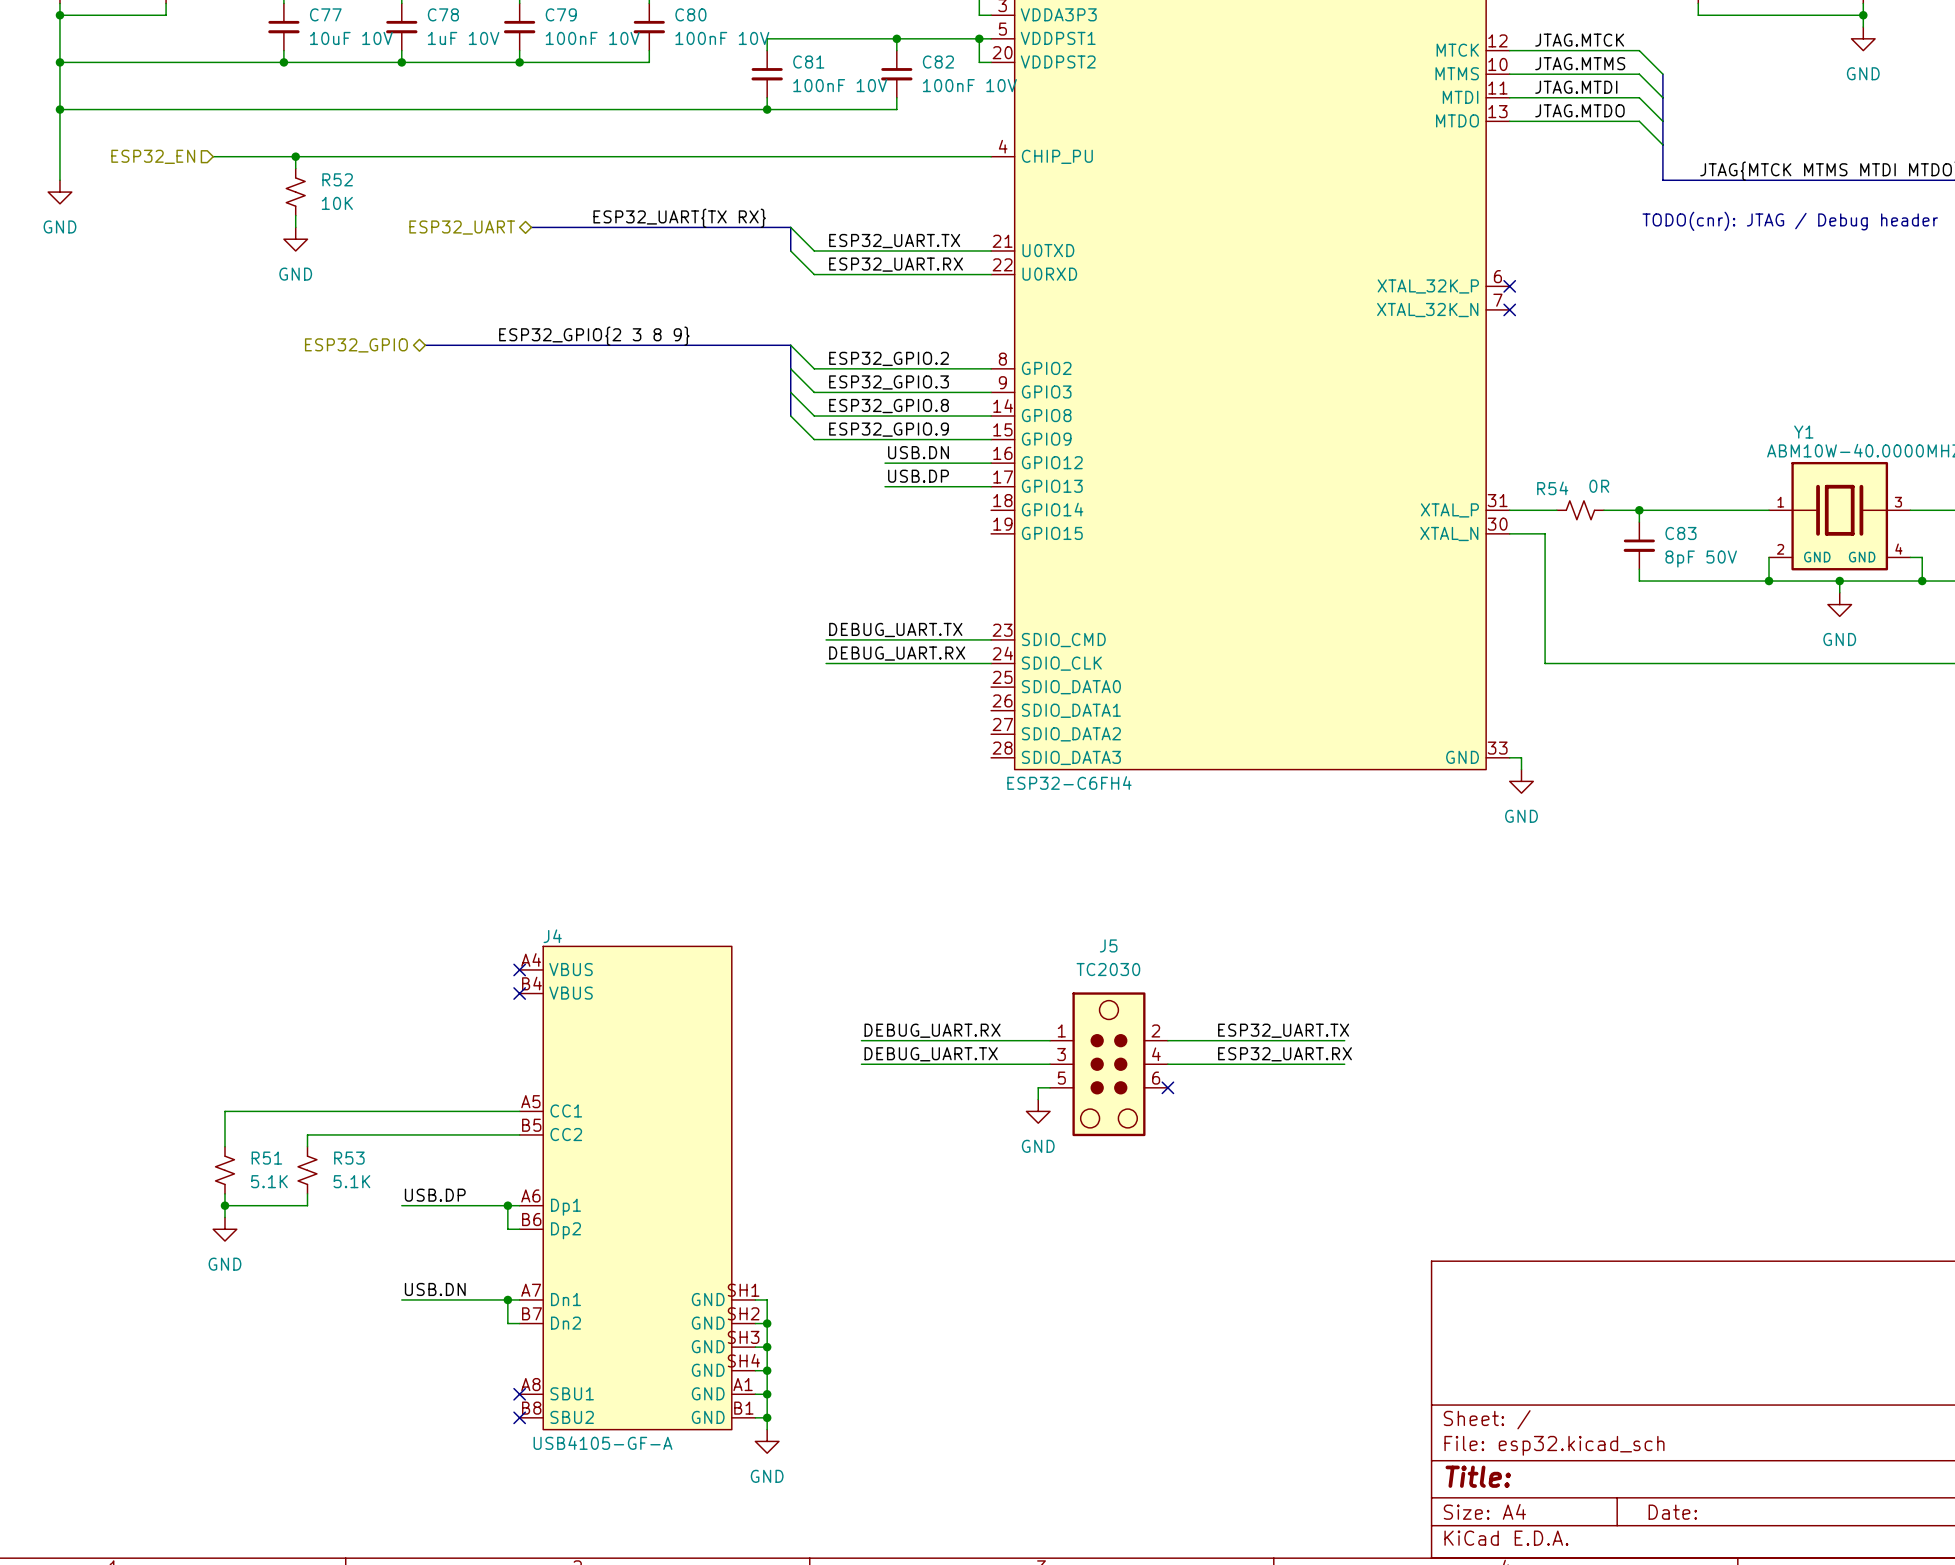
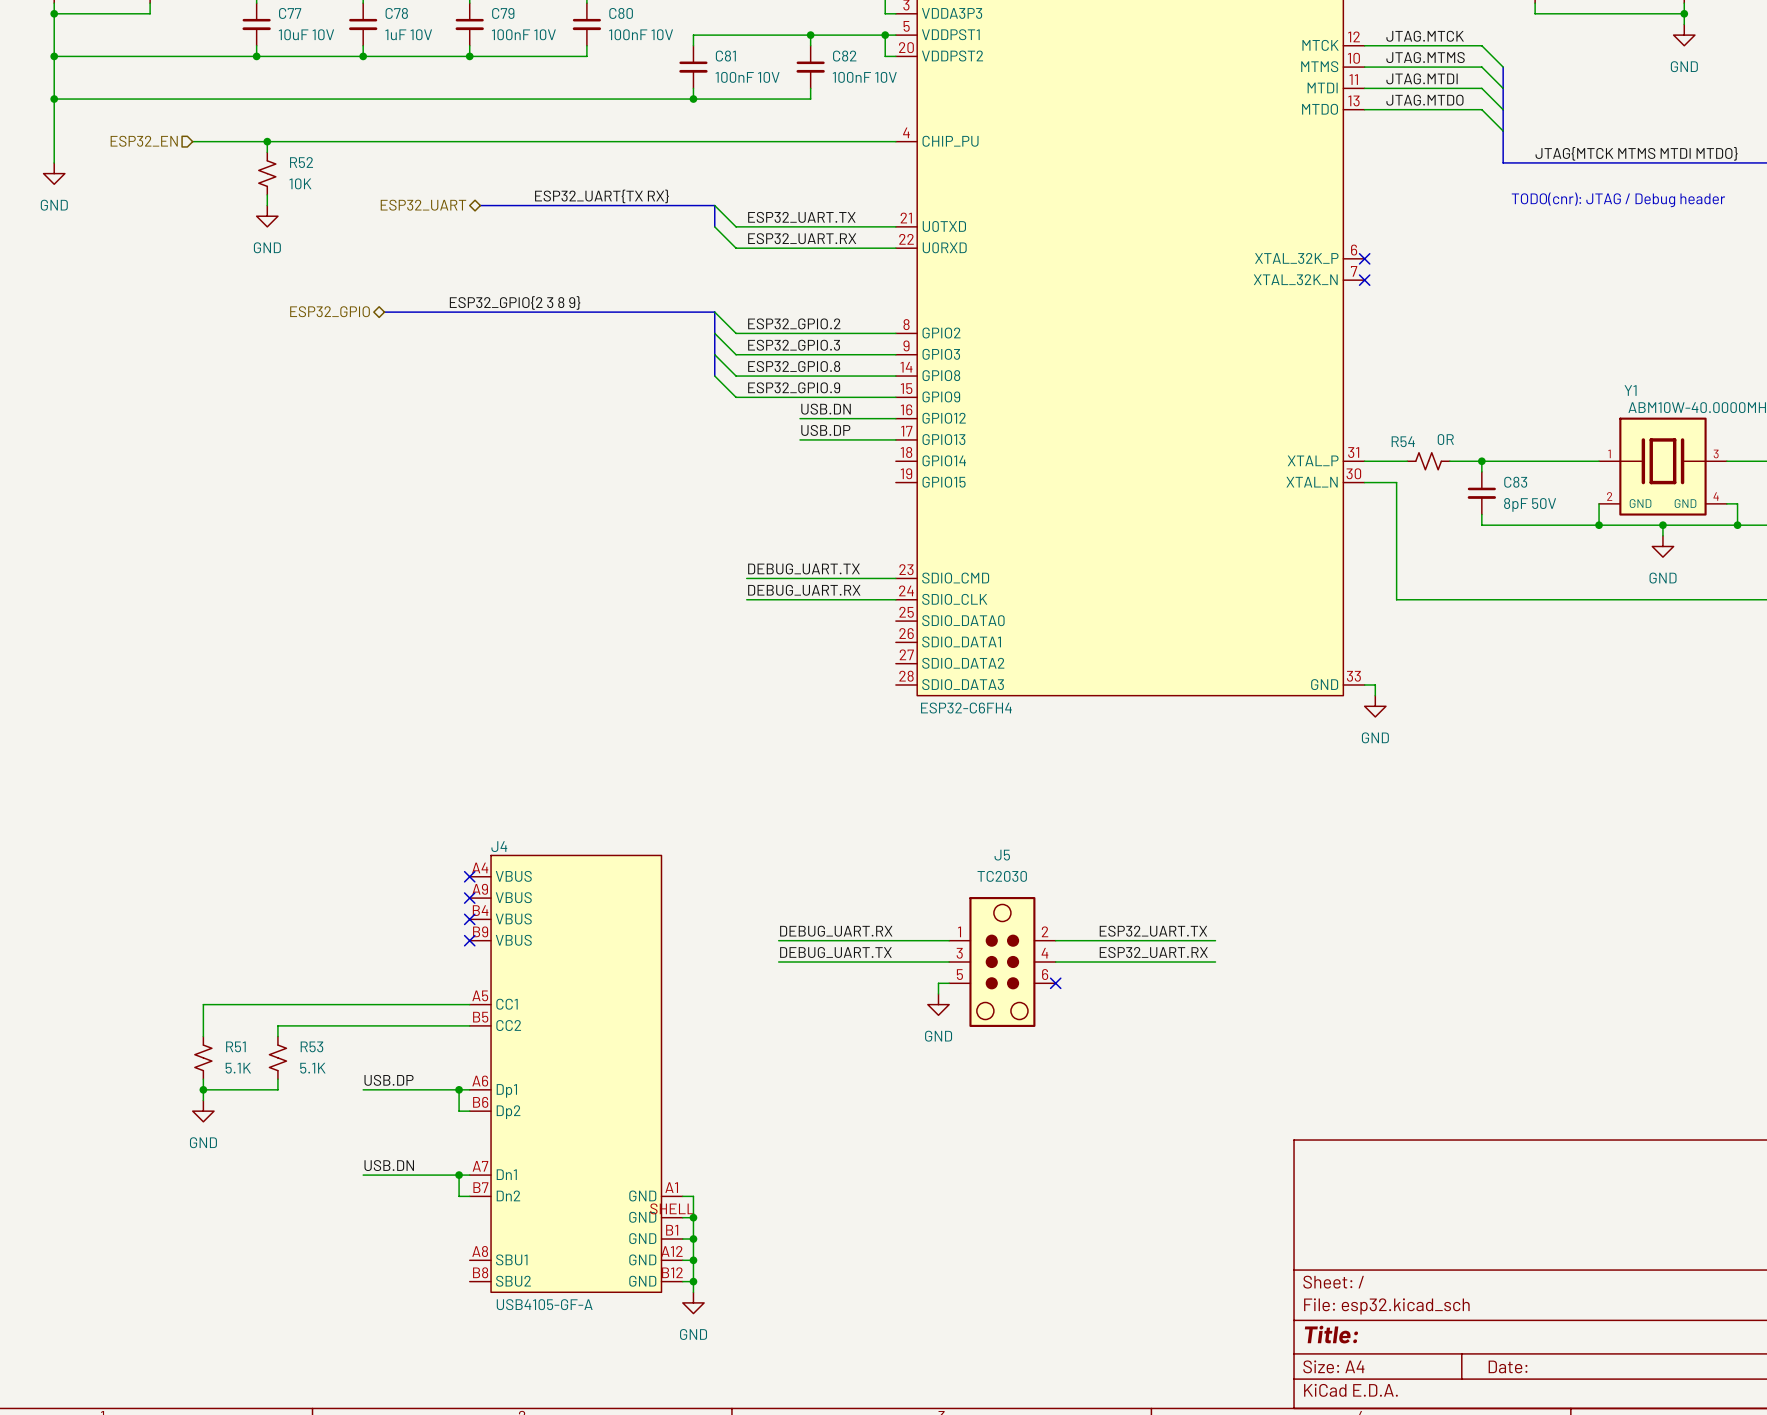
J4 symbol: [519, 946, 756, 1430] -> [469, 855, 683, 1293]
no-connect mark: none -> (469, 919)
no-connect mark: none -> (469, 940)
wire: (755, 1299) (767, 1299) (767, 1323) -> none
junction: (767, 1323) -> none
no-connect mark: (519, 1394) -> none
no-connect mark: (519, 1417) -> none

